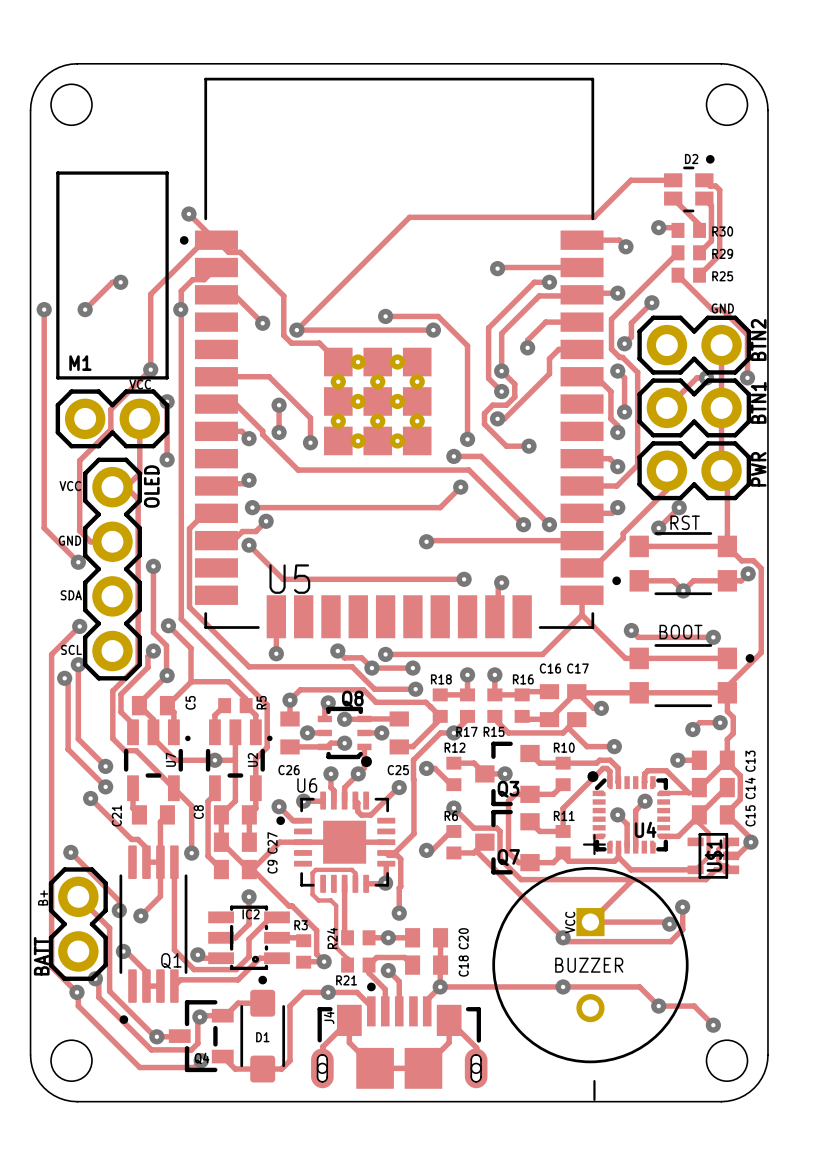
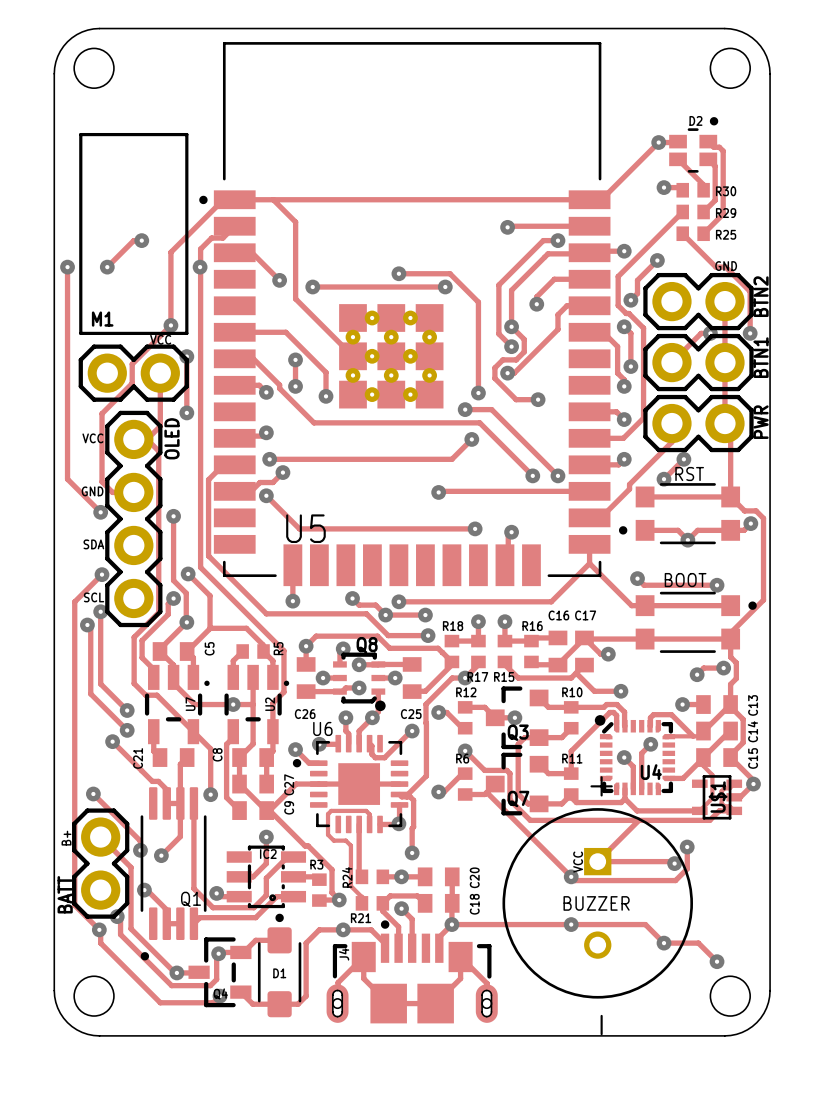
track: (673, 180) (630, 180) (593, 217) (409, 217) (296, 330) -> none
track: (188, 214) (215, 240) -> none
via: (188, 214) -> none
track: (216, 240) (228, 252) (240, 252) (283, 295) (283, 335) (291, 343) (319, 343) (338, 362) -> (234, 199) (589, 199)
track: none -> (273, 199) (295, 222) (295, 298) (352, 356)
track: (594, 240) (619, 240) (625, 246) -> (601, 199) (658, 142) (677, 142)
via position: (625, 246) -> (658, 142)

